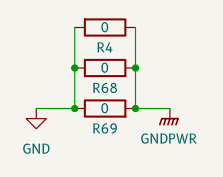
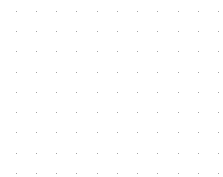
wire: (74, 27) (74, 108) (36, 108) -> none
R4: 0 (105, 27) -> none
wire: (135, 27) (135, 108) (169, 108) -> none
junction: (74, 68) -> none
R68: 0 (105, 68) -> none
junction: (135, 68) -> none
junction: (74, 108) -> none
R69: 0 (105, 108) -> none
junction: (135, 108) -> none
power symbol: GNDPWR (168, 117) -> none
power symbol: GND (36, 118) -> none

